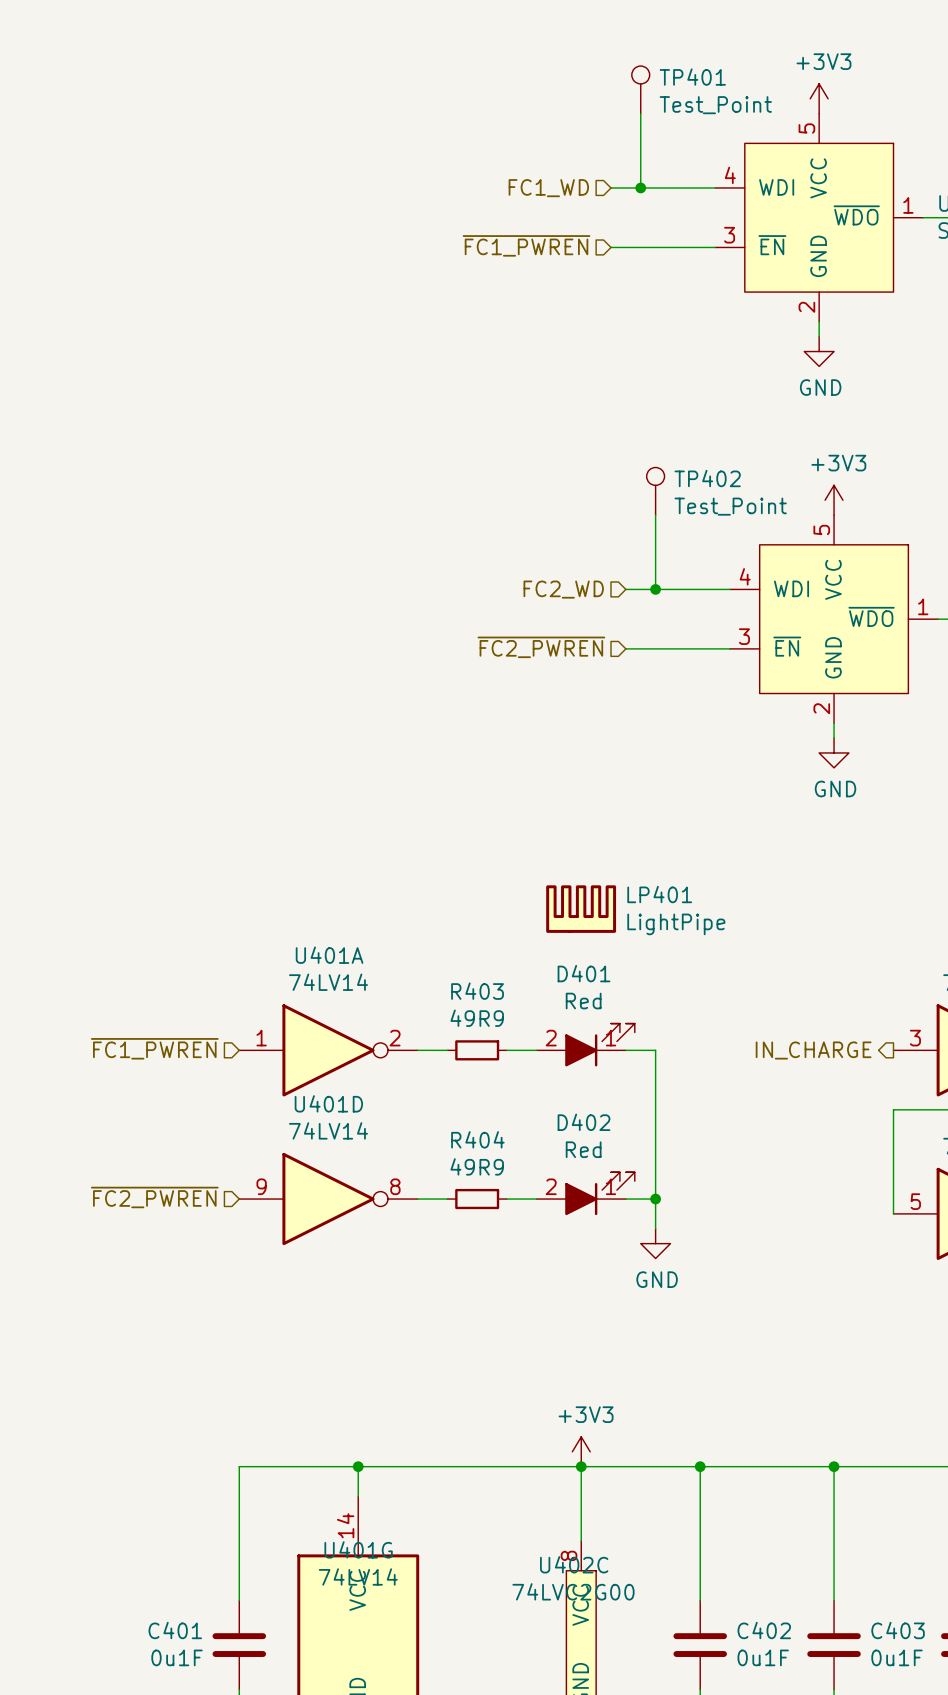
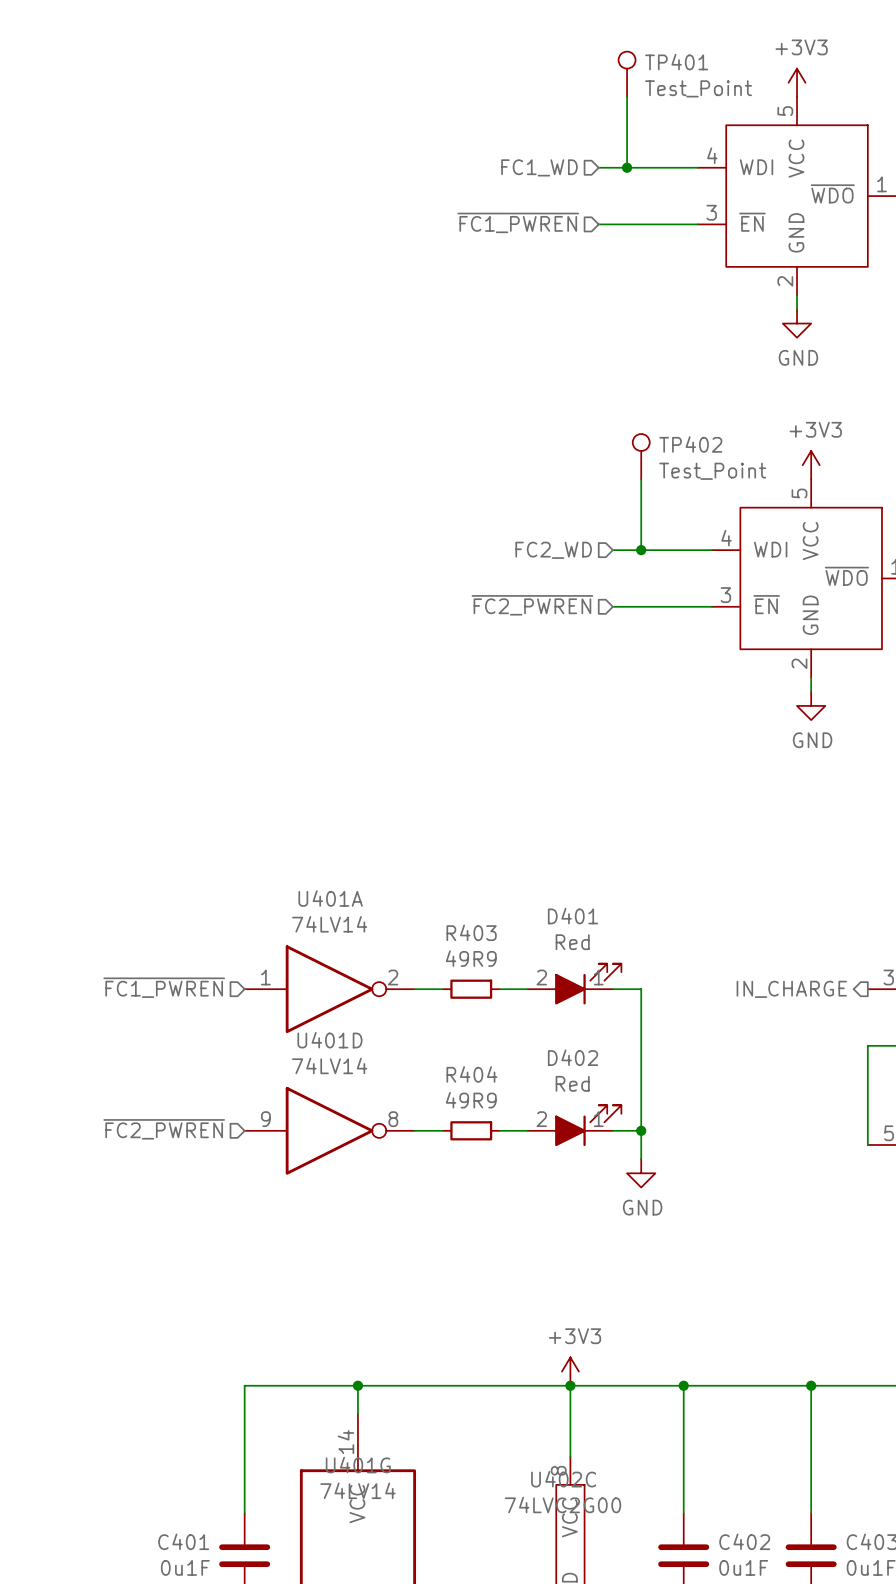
LP401: LightPipe (581, 909) -> none

